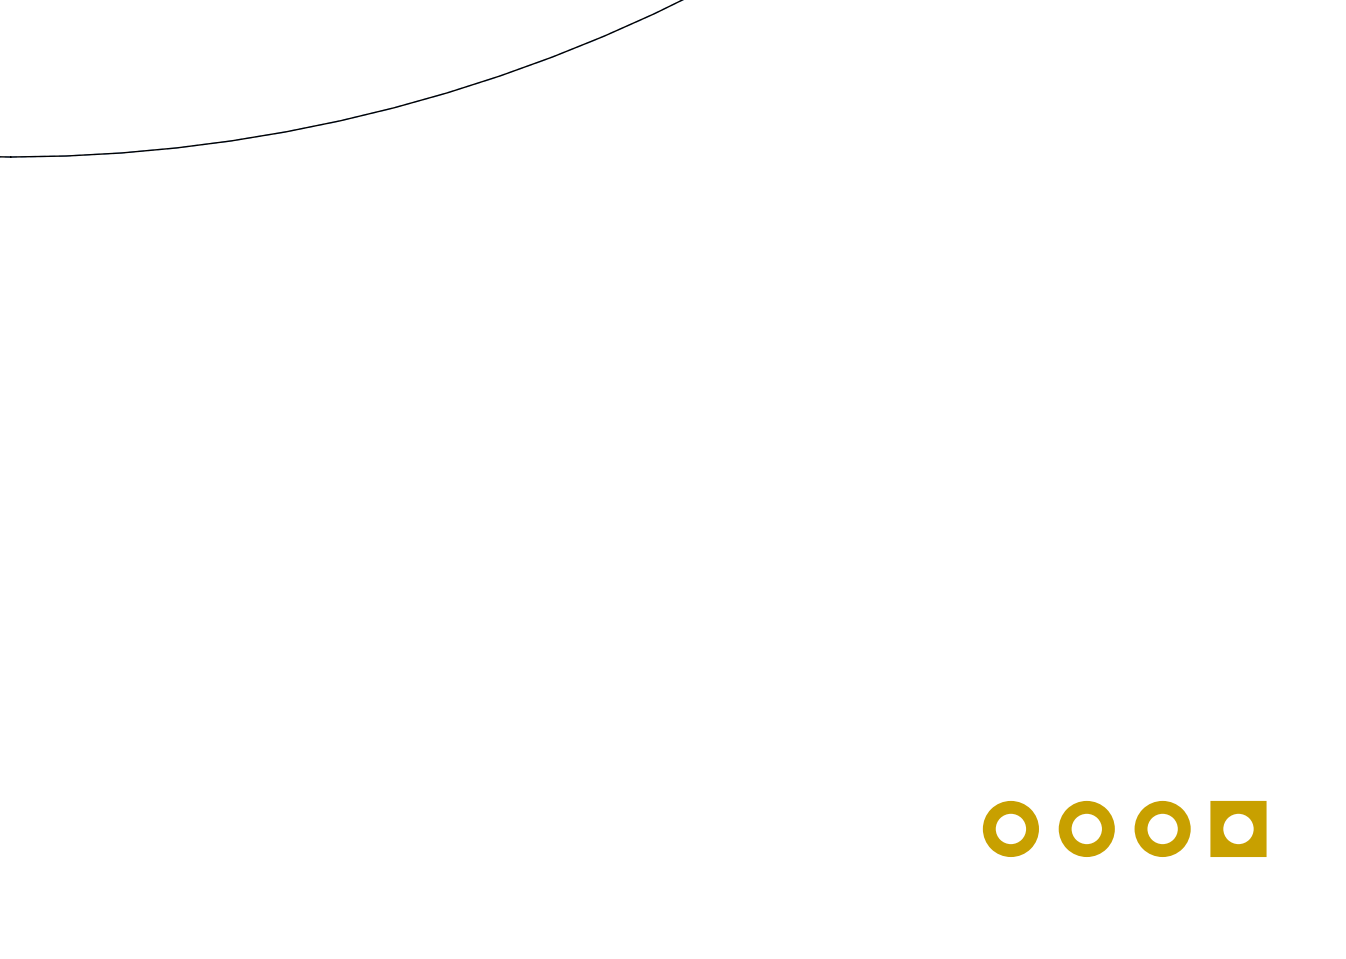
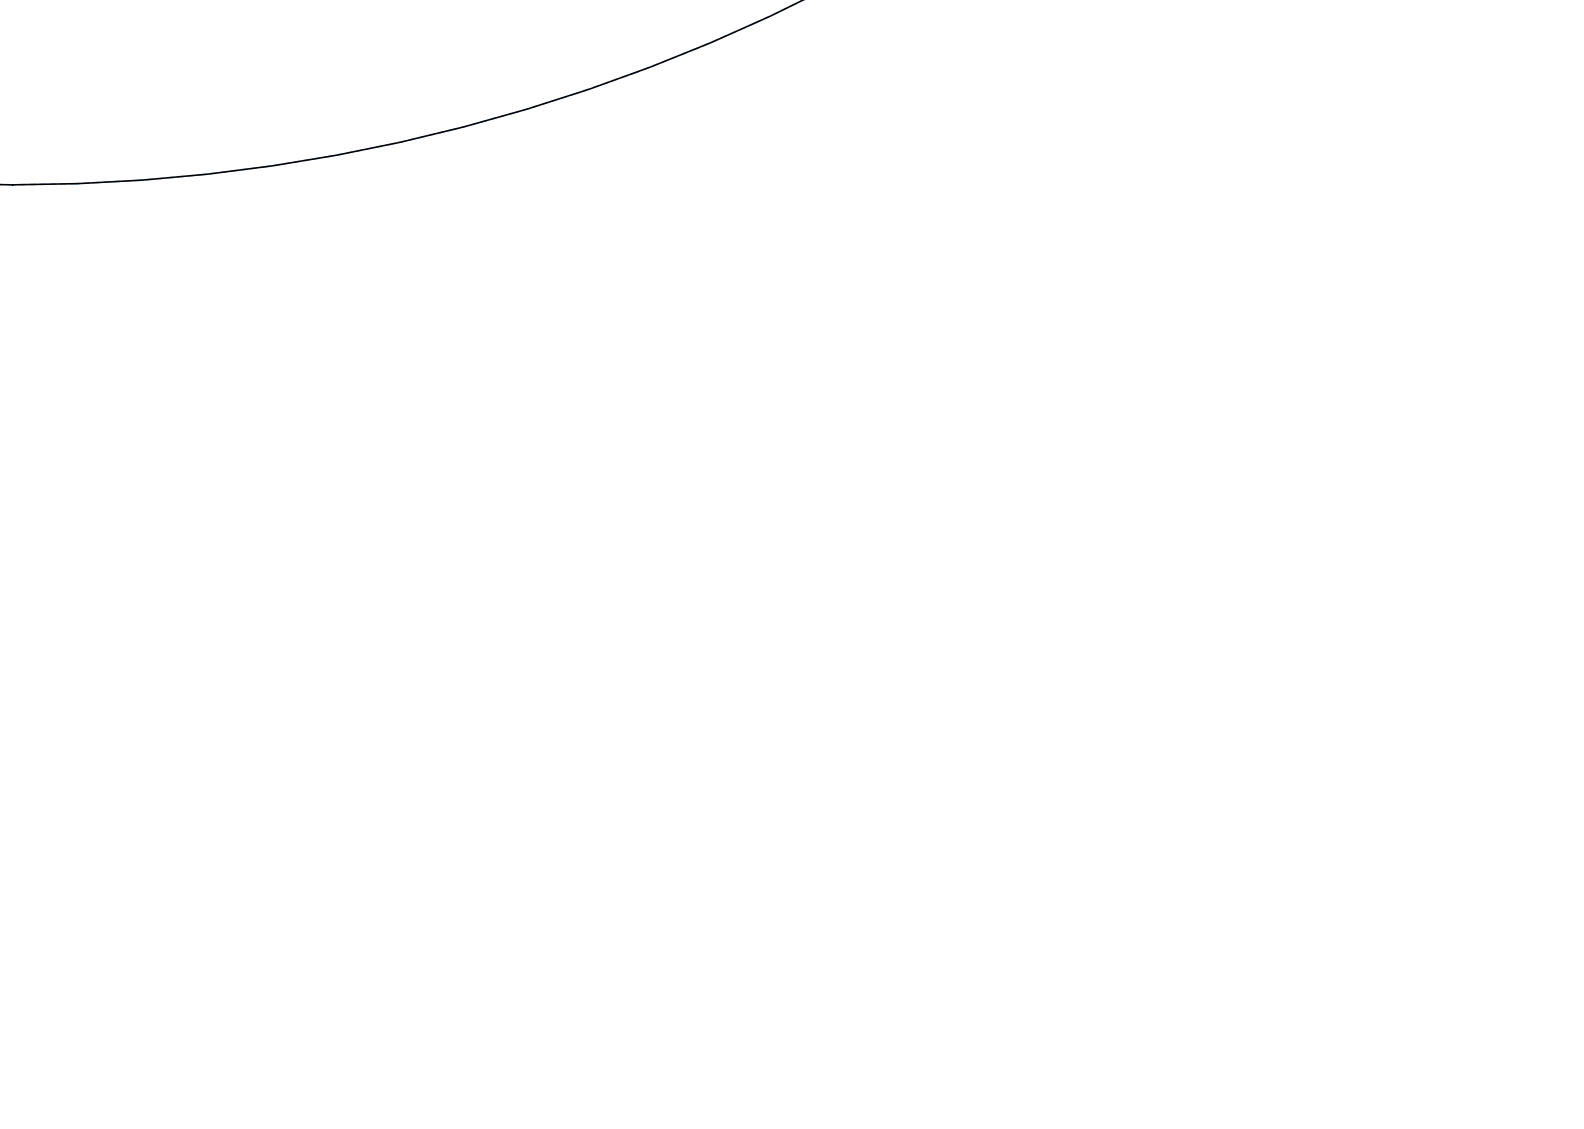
part: (1124, 828) -> none

